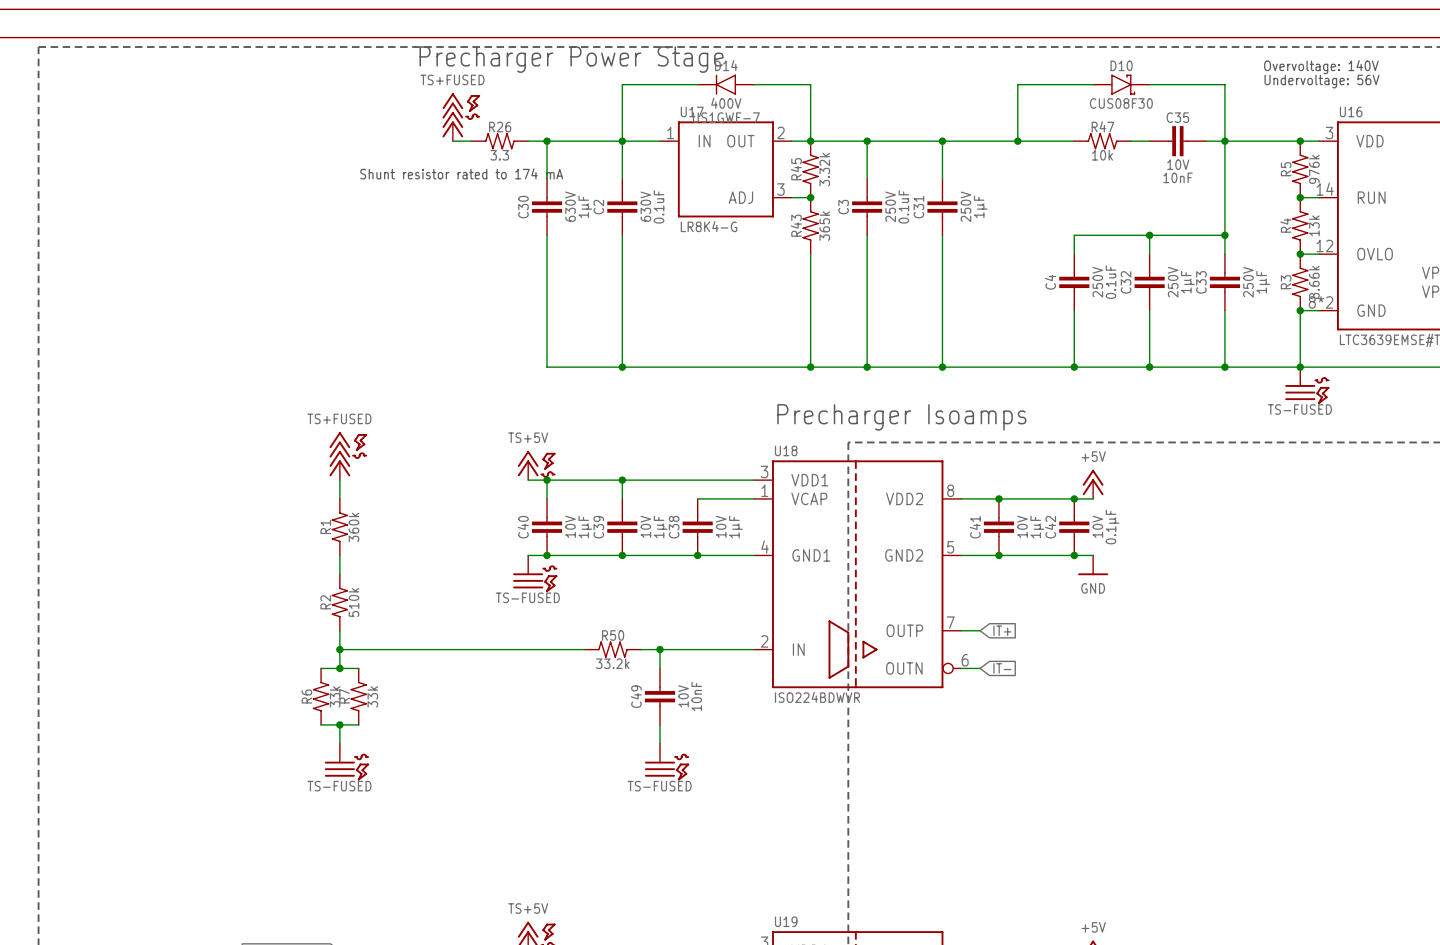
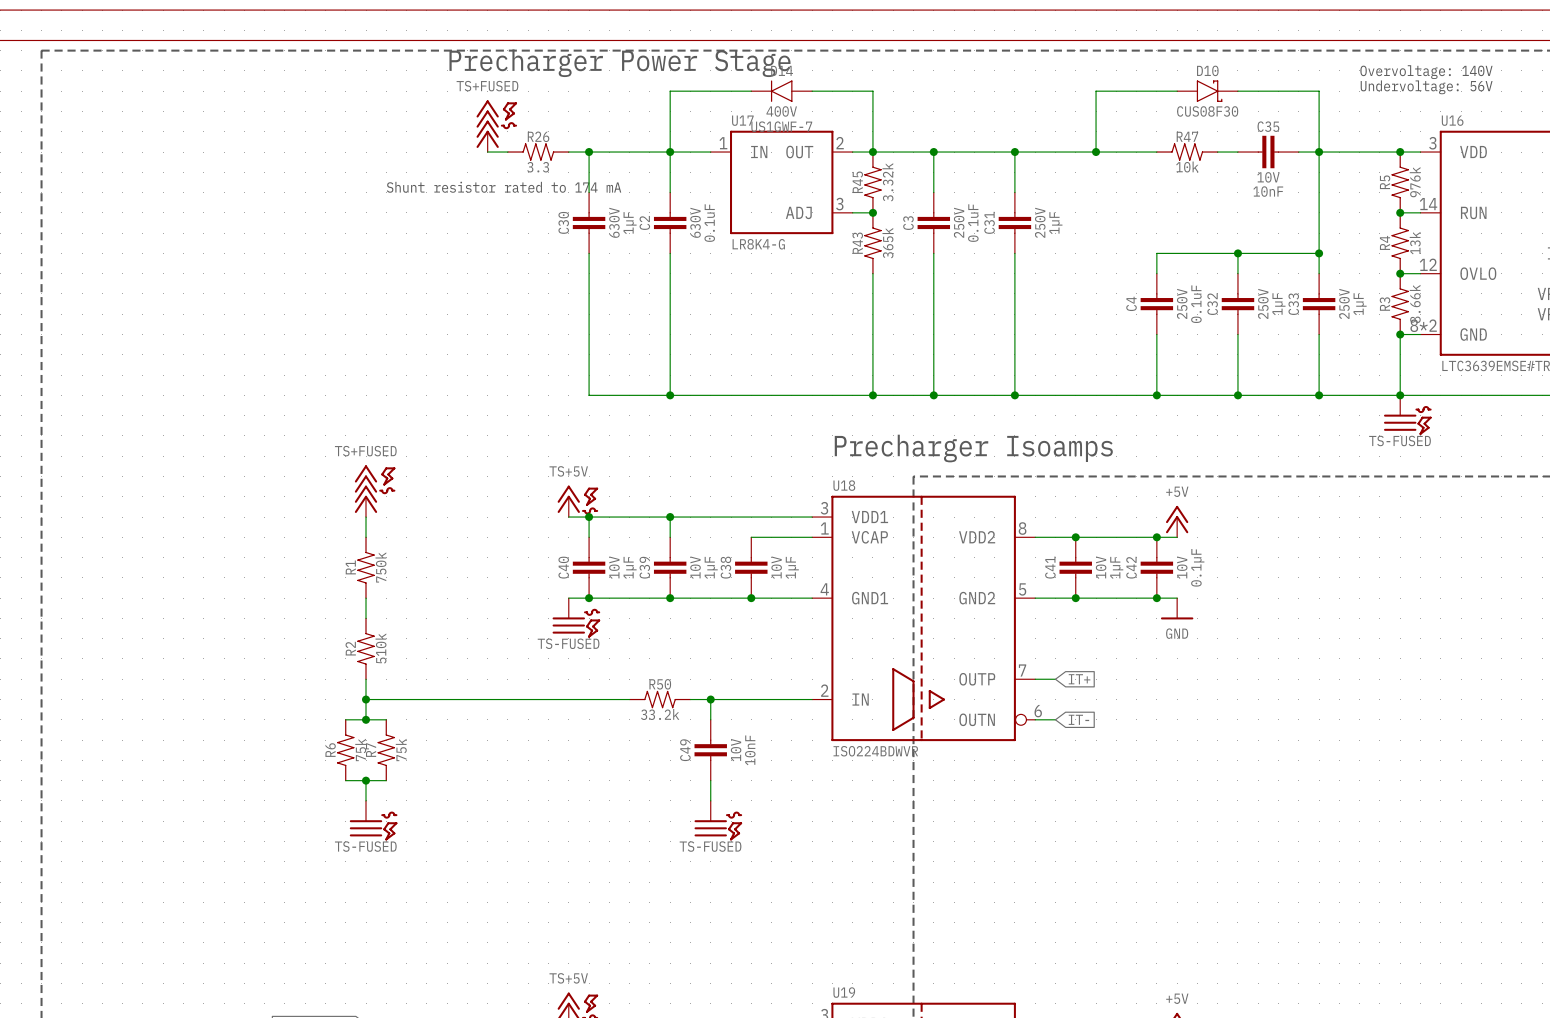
R1 text: 360k (354, 527) -> 750k (380, 567)
R6 text: 33k (335, 696) -> 75k (360, 749)
R7 text: 33k (372, 696) -> 75k (401, 749)

